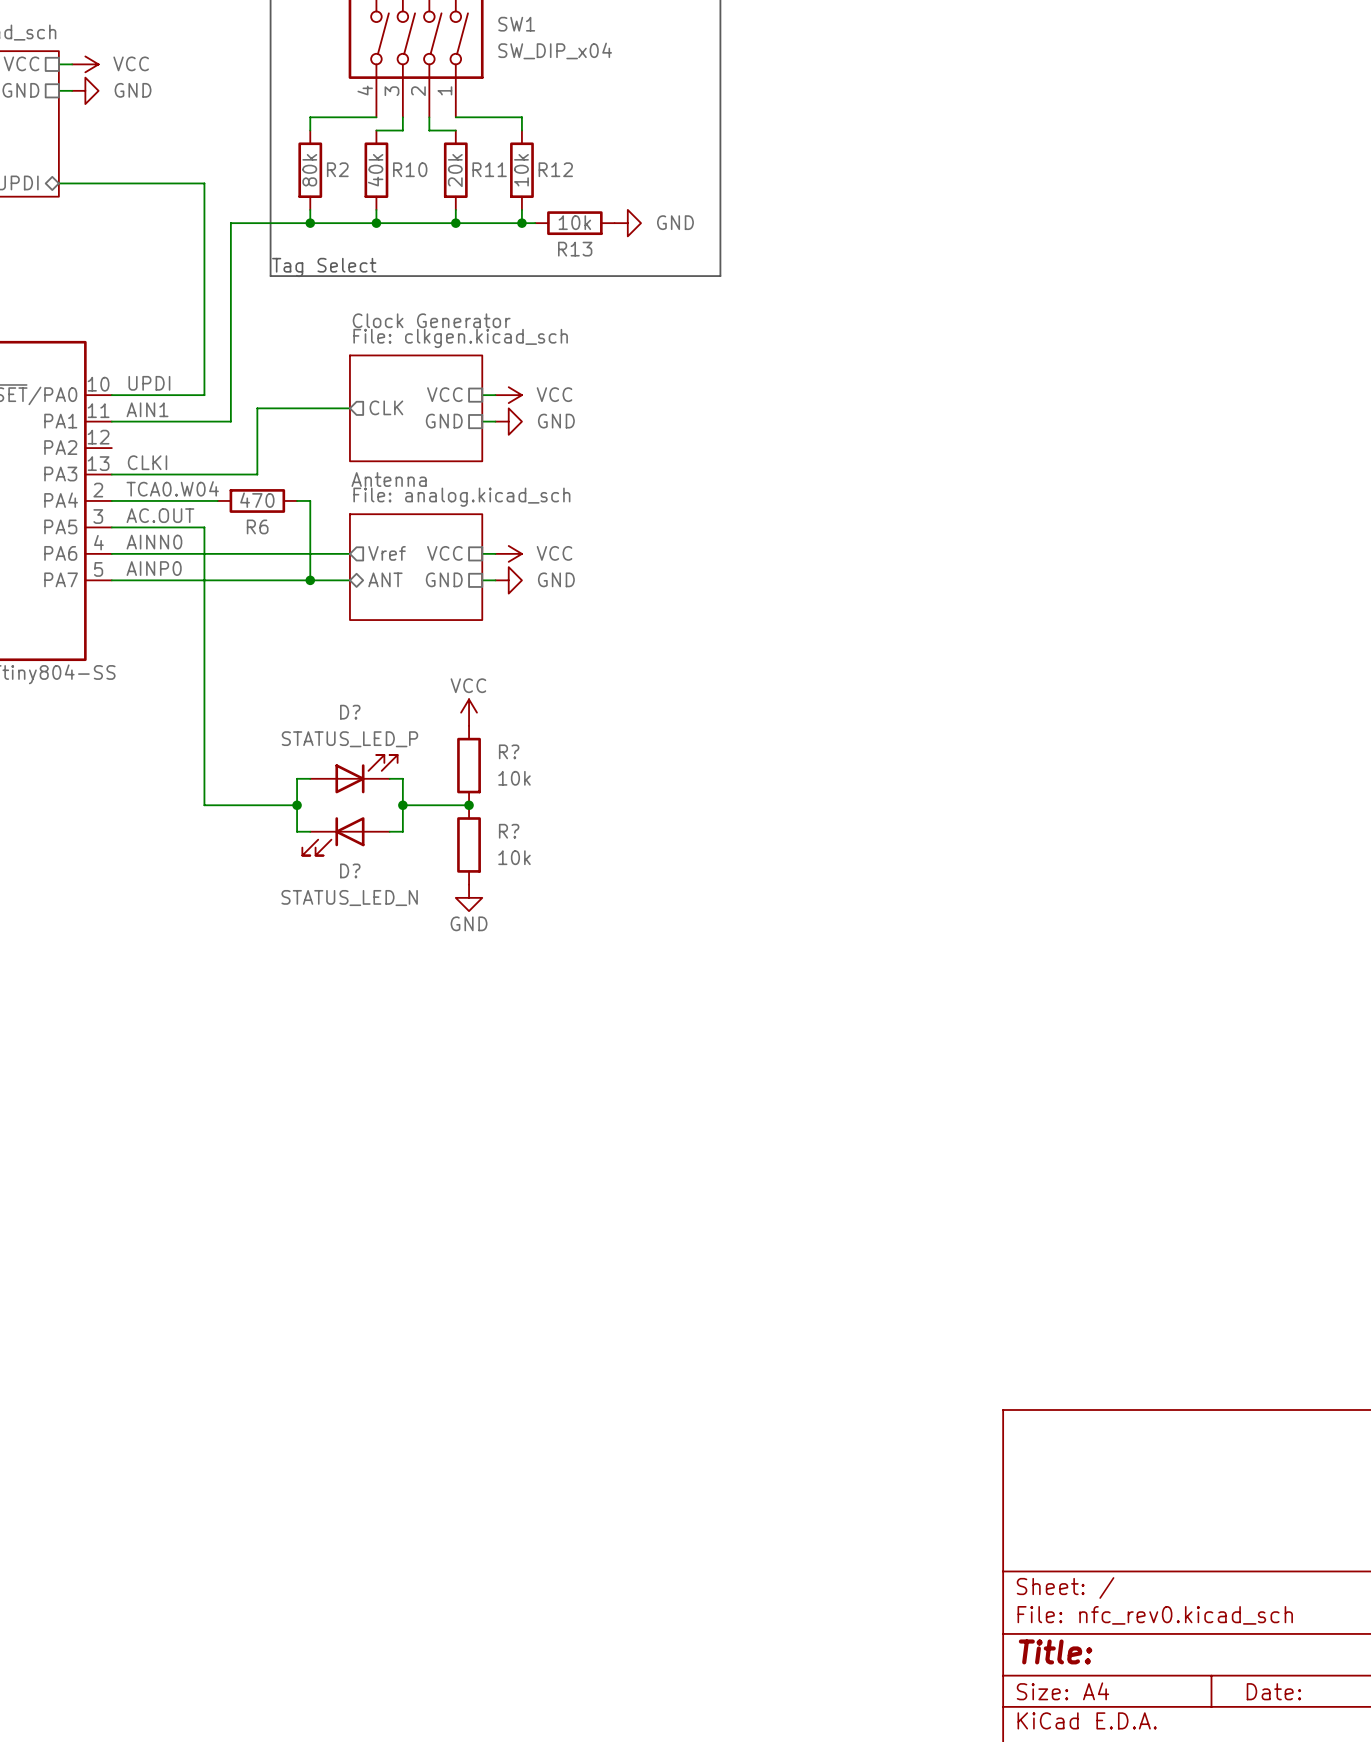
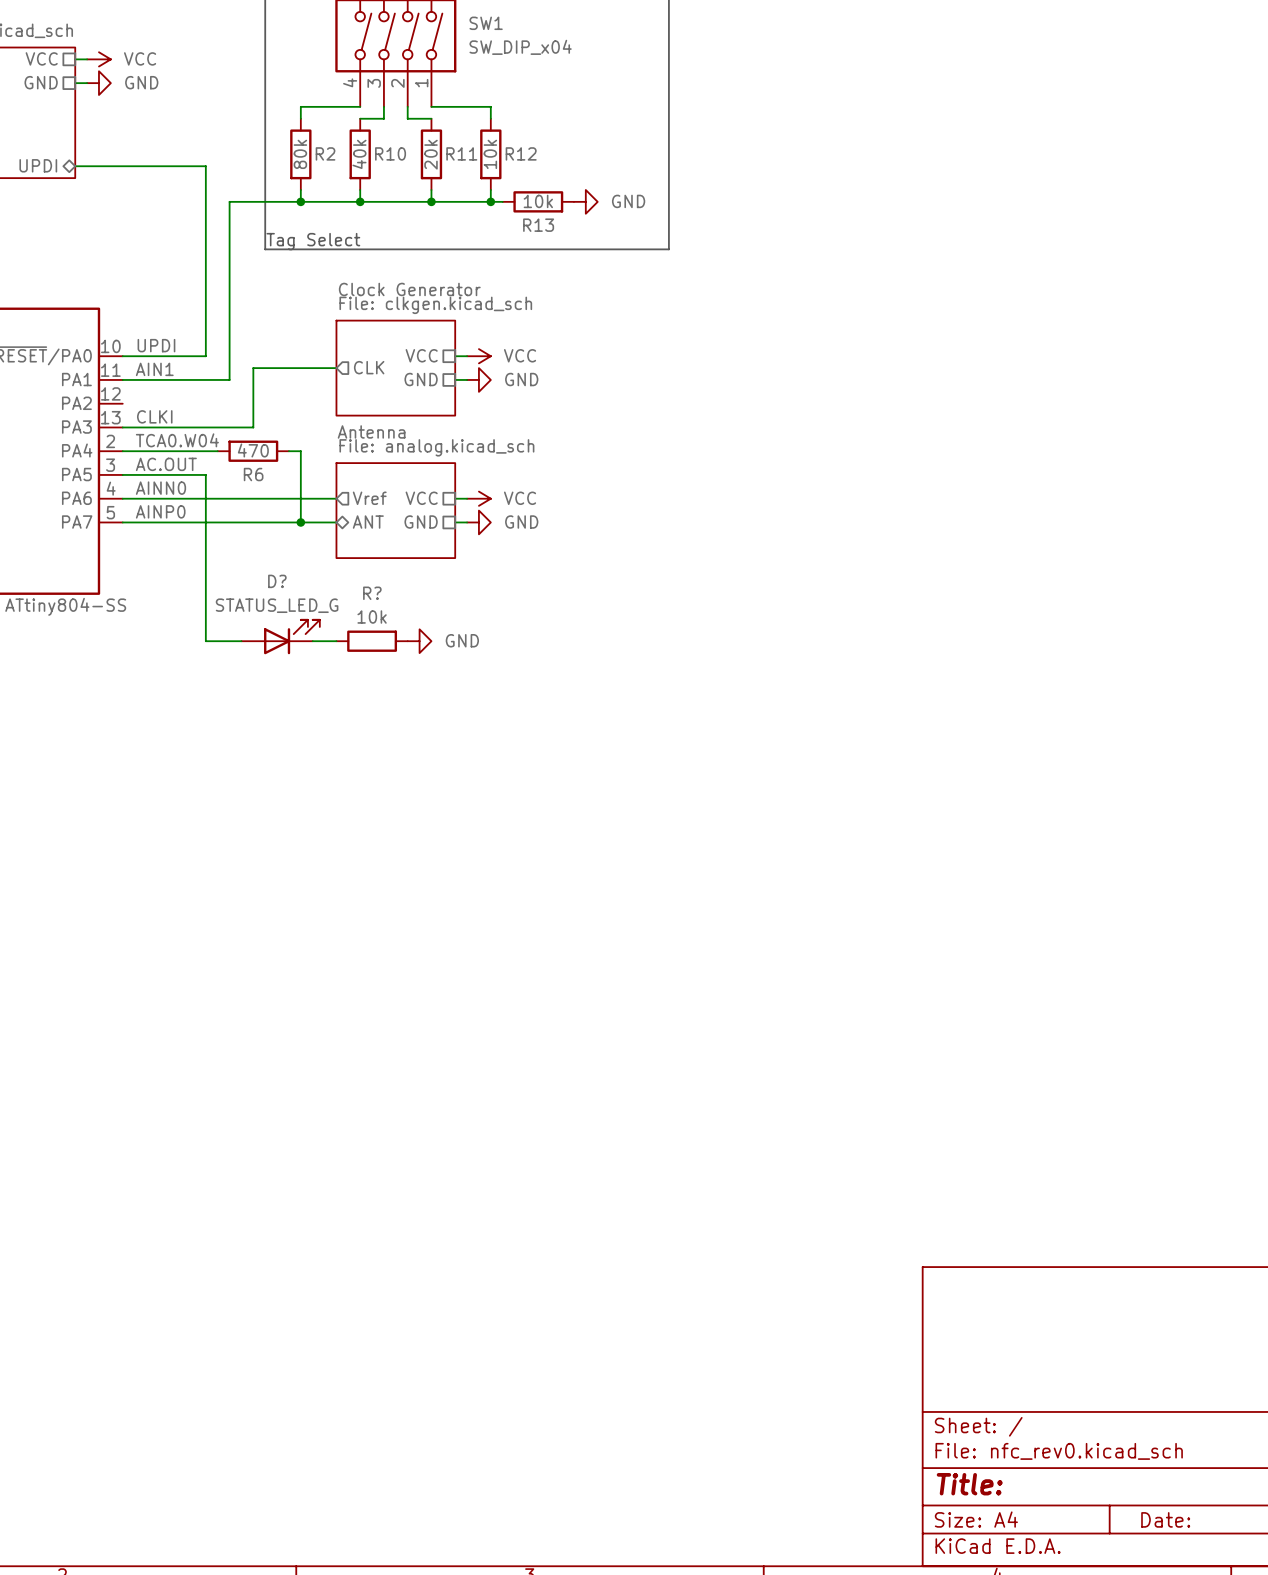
D?: none -> STATUS_LED_G (280, 637)
wire: (204, 712) (204, 805) (297, 805) -> (205, 641) (241, 641)
wire: none -> (312, 641) (336, 641)
R?: none -> 10k (372, 641)
power symbol: VCC (469, 712) -> none
R?: 10k (469, 765) -> none
D?: STATUS_LED_P (353, 774) -> none
wire: (310, 778) (297, 778) (297, 831) (310, 831) -> none
wire: (389, 778) (402, 778) (402, 831) (389, 831) -> none
junction: (297, 805) -> none
wire: (402, 805) (469, 805) -> none
junction: (402, 805) -> none
junction: (469, 805) -> none
D?: STATUS_LED_N (346, 836) -> none
R?: 10k (469, 844) -> none
power symbol rotation: 0° (469, 897) -> 90° counterclockwise (419, 641)
power symbol position: GND (469, 897) -> GND (419, 641)
power symbol text position: GND (469, 923) -> GND (462, 640)

